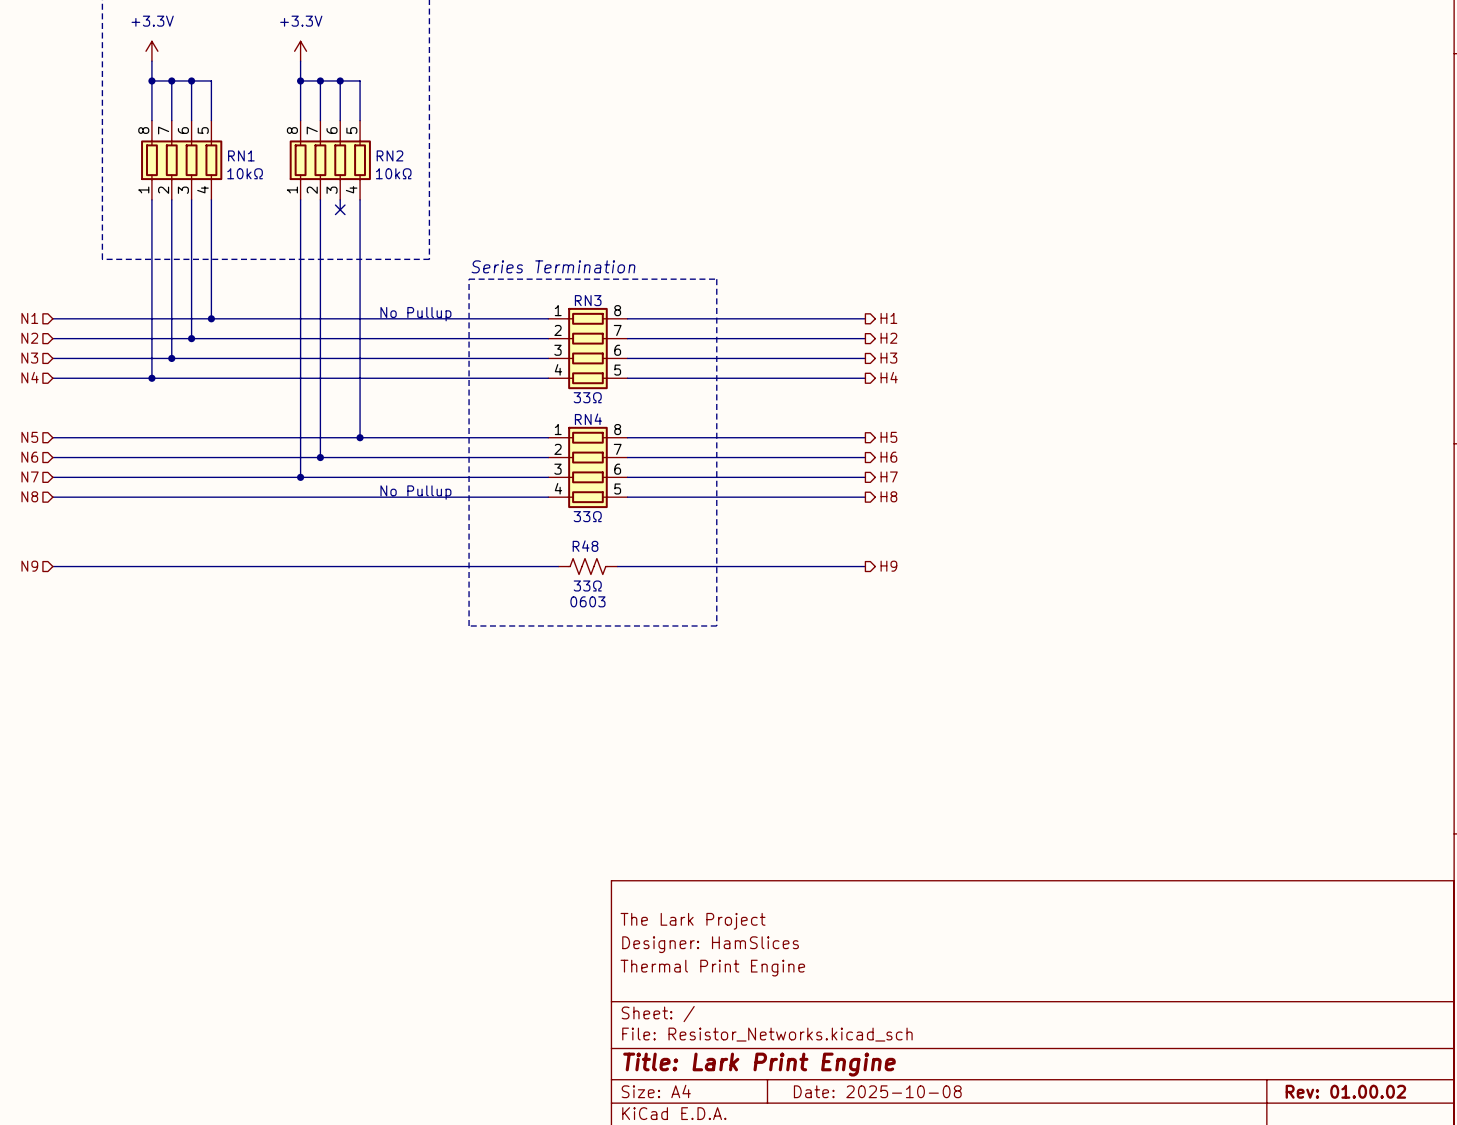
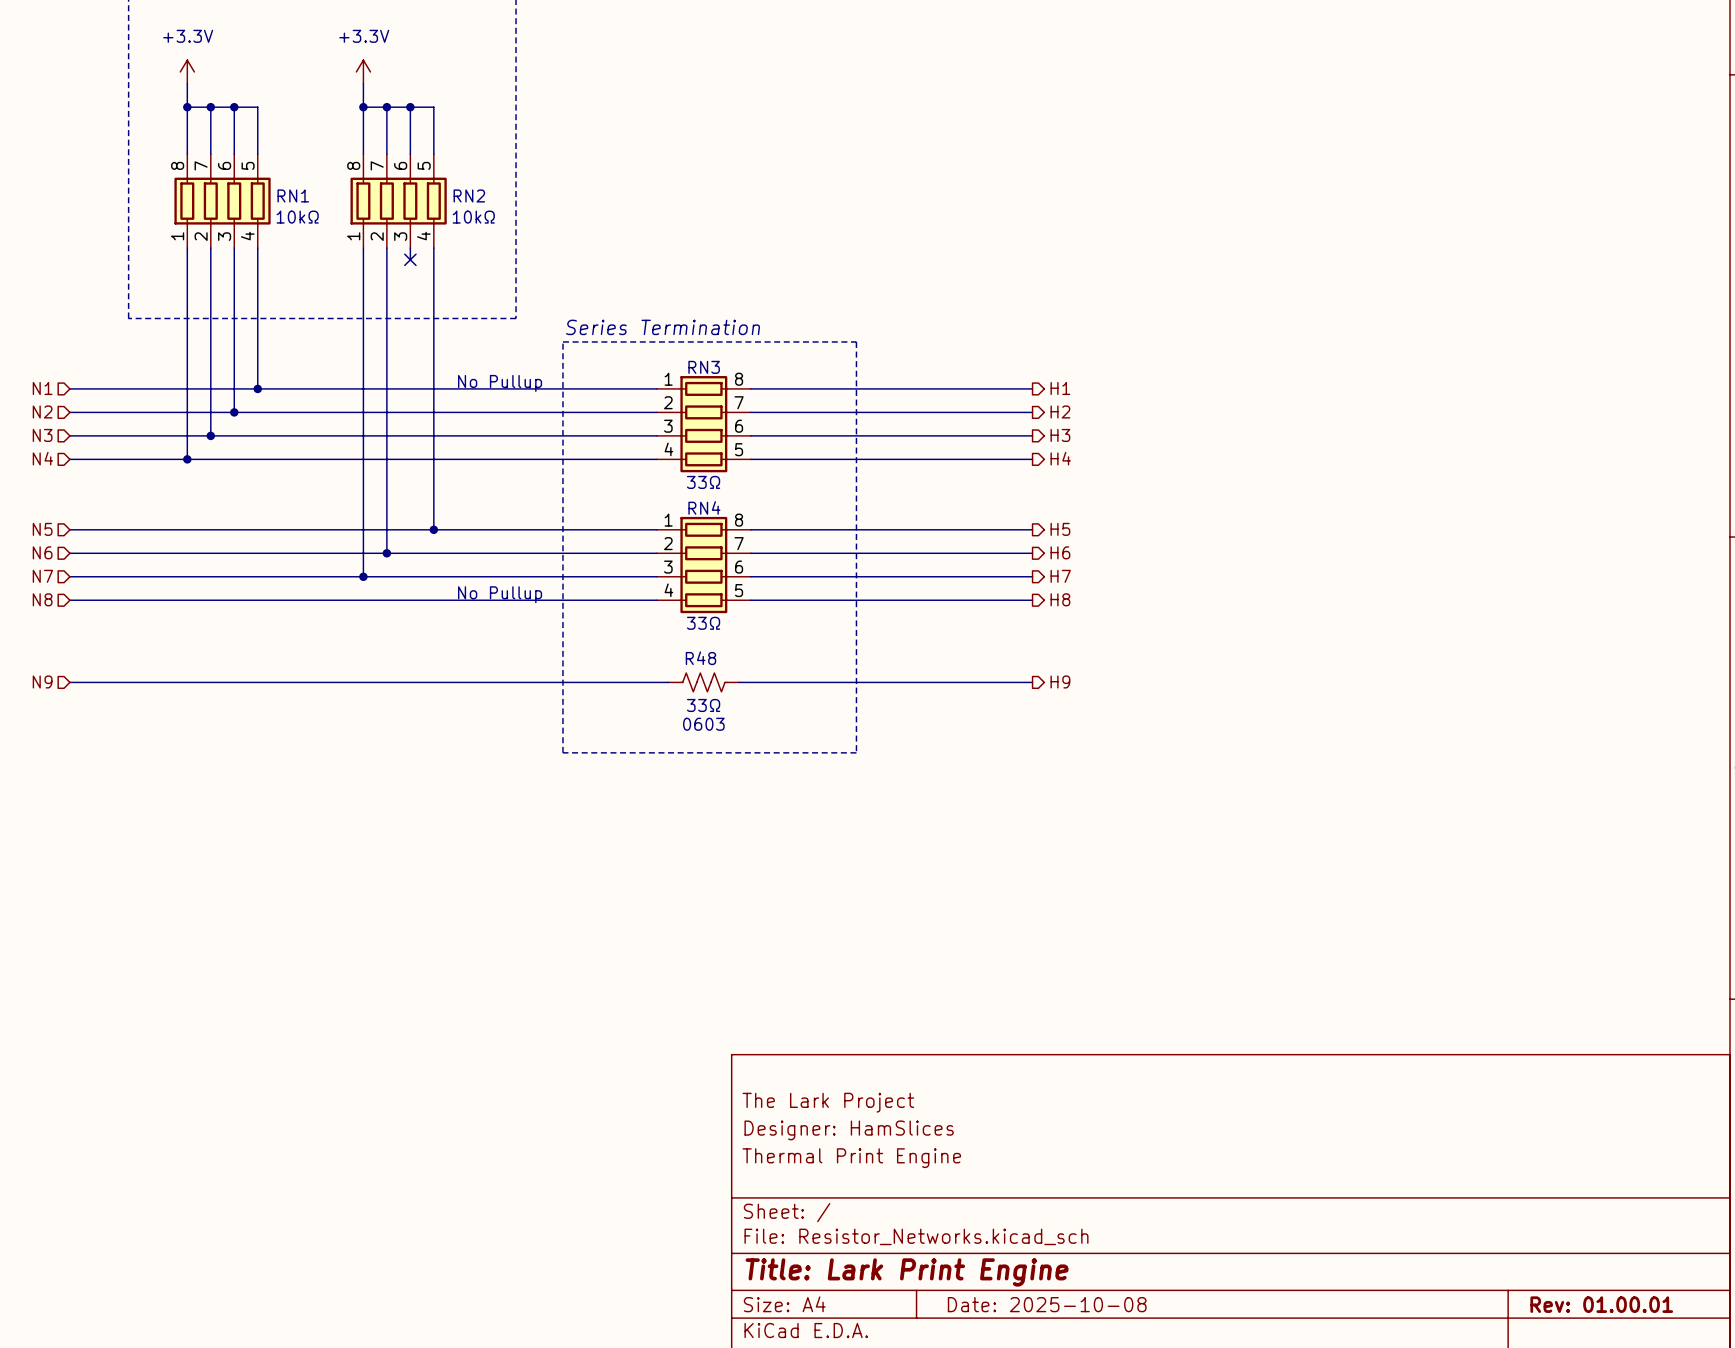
title block: Rev: 01.00.02 (1345, 1091) -> Rev: 01.00.01 (1601, 1304)

